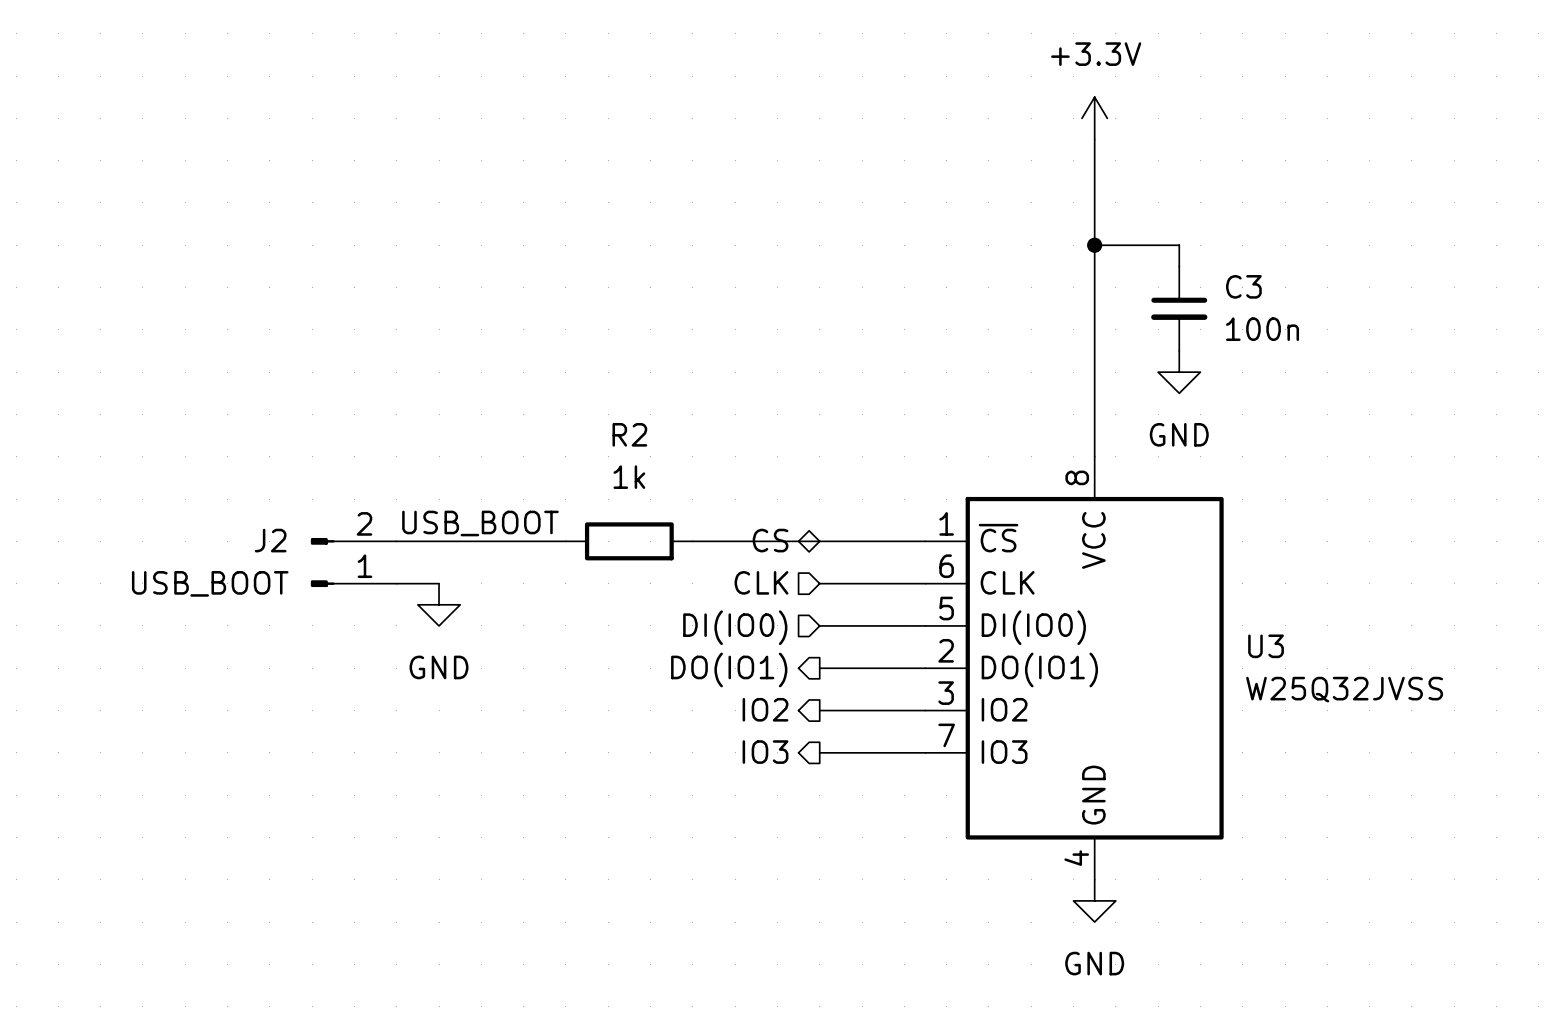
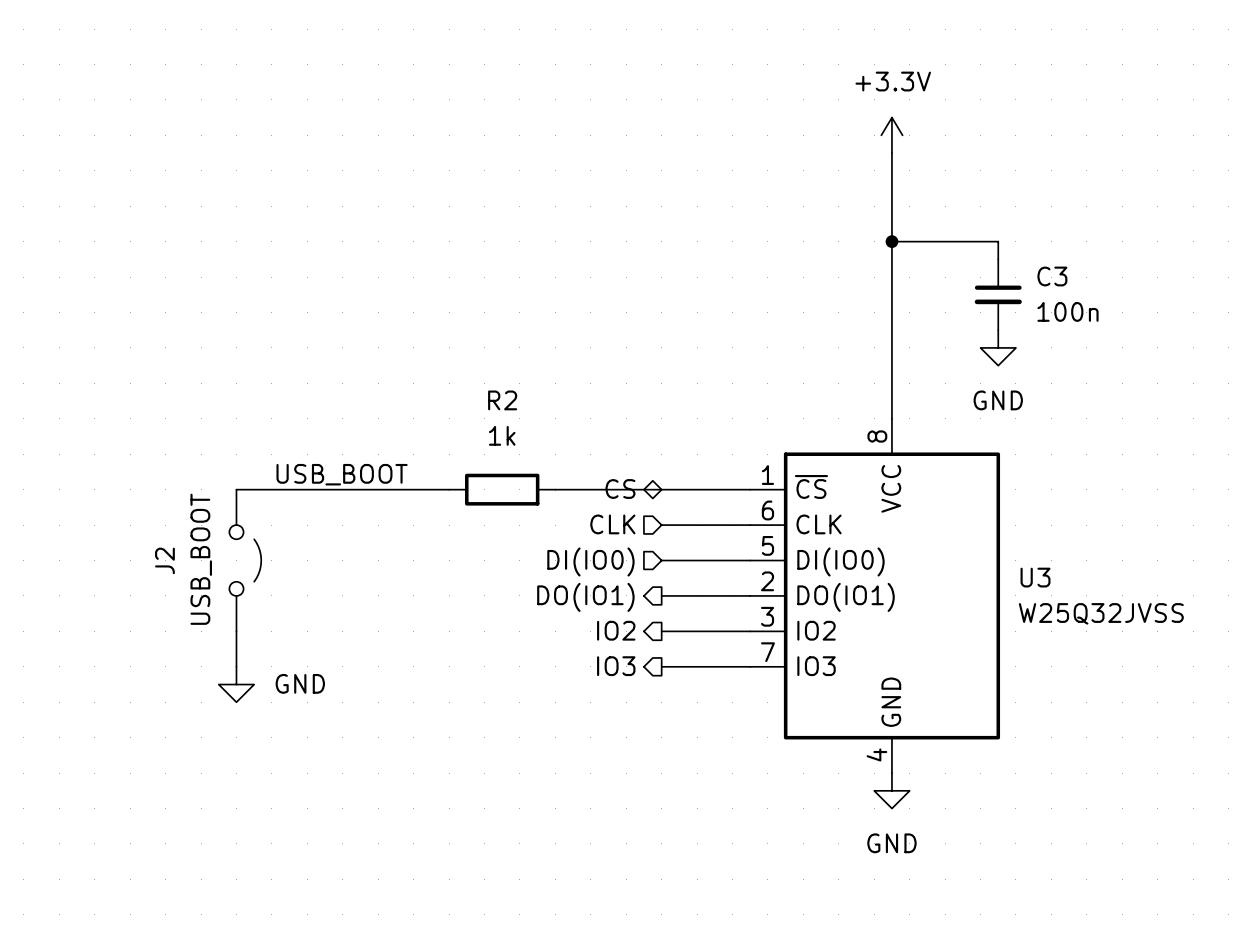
wire: (1179, 245) (1179, 266) -> (962, 241) (998, 241) (998, 259)
C3 position: (1179, 308) -> (998, 294)
power symbol position: GND (1179, 372) -> GND (998, 347)
label position: USB_BOOT (480, 523) -> USB_BOOT (342, 474)
J2 symbol: [310, 537, 397, 588] -> [229, 489, 262, 632]
J2 value position: USB_BOOT (210, 583) -> USB_BOOT (201, 559)
wire: (396, 583) (439, 583) -> none
power symbol position: GND (439, 604) -> GND (236, 684)
power symbol text position: GND (439, 667) -> GND (300, 683)
wire: none -> (236, 631) (236, 666)

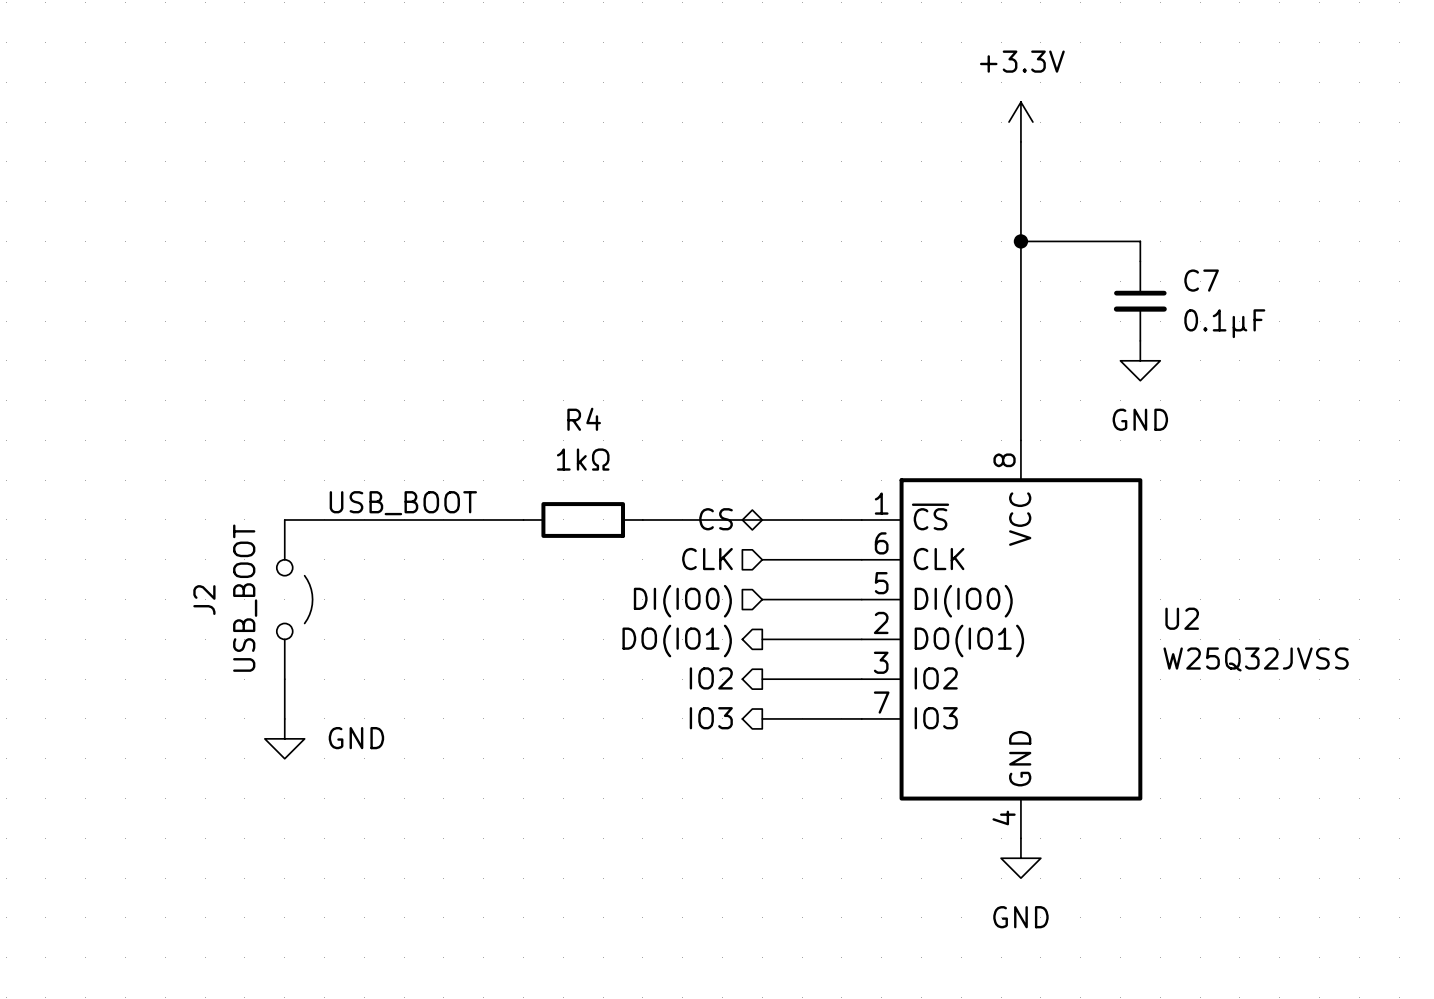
C3 name: C3 (1052, 276) -> C7 (1201, 280)
C3 value: 100n (1068, 311) -> 0.1μF (1224, 323)
R2 name: R2 (502, 400) -> R4 (584, 419)
R2 value: 1k (502, 435) -> 1kΩ (583, 459)
U3 name: U3 (1035, 577) -> U2 (1182, 618)

